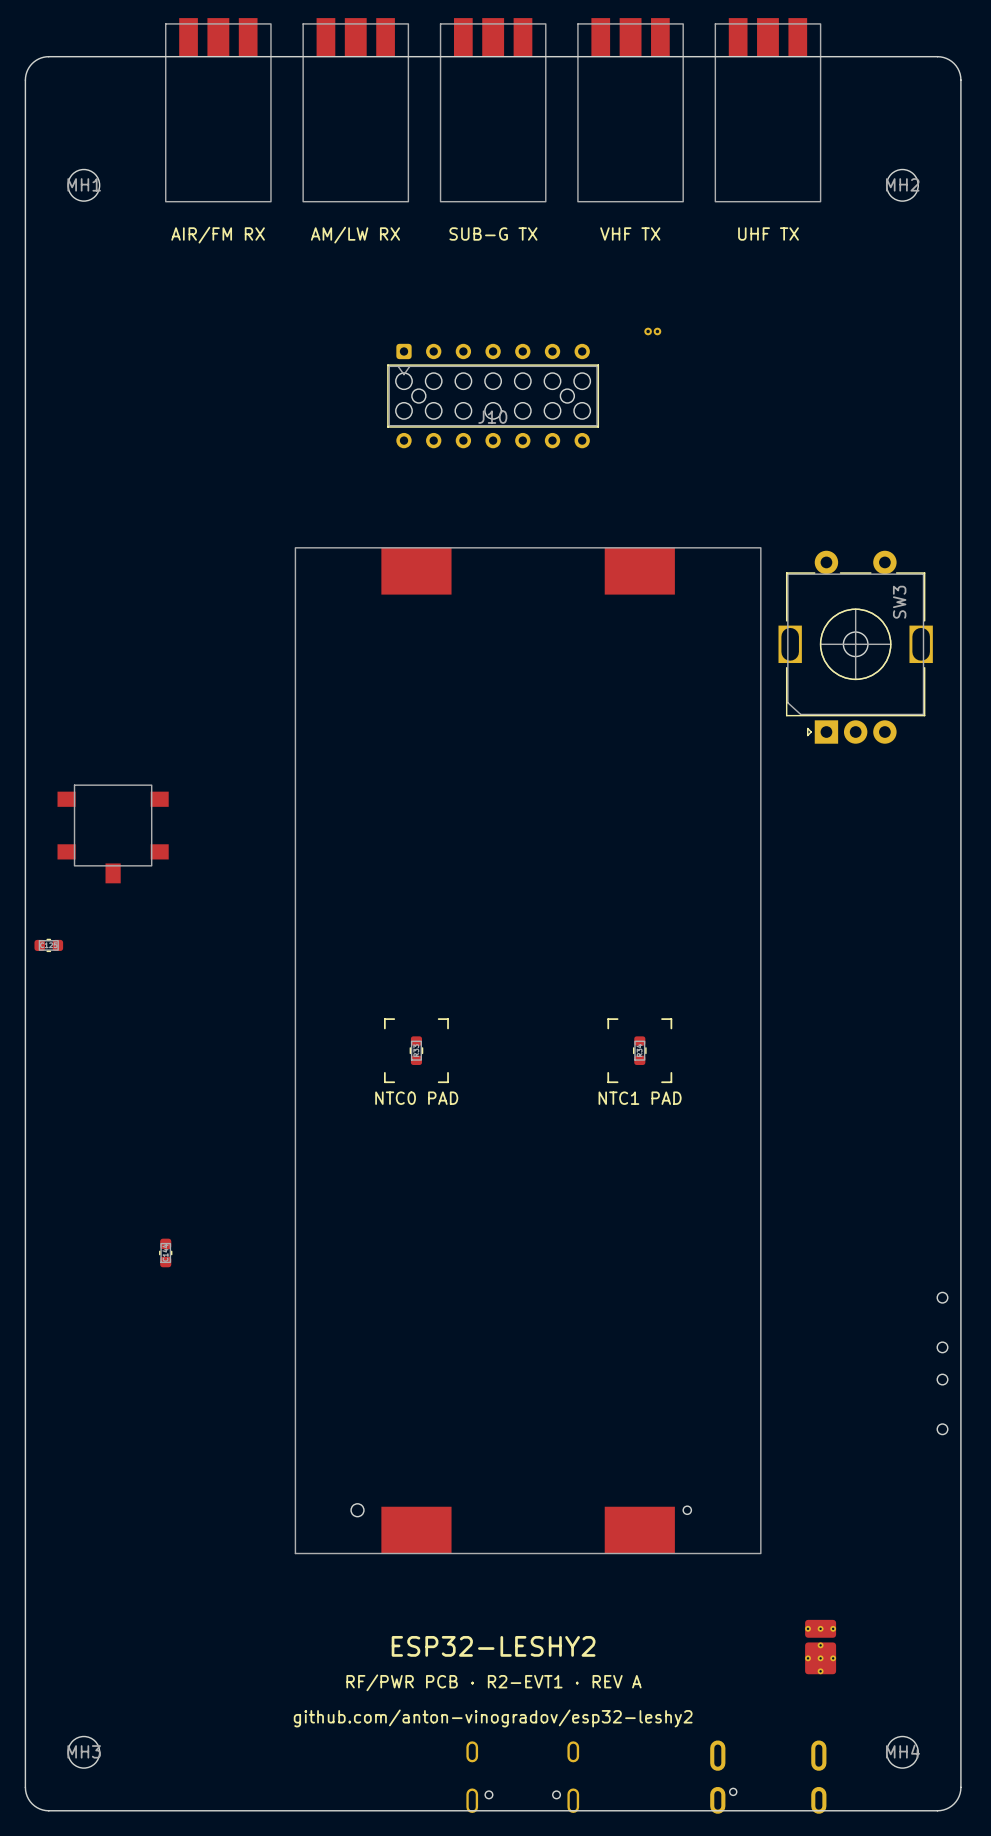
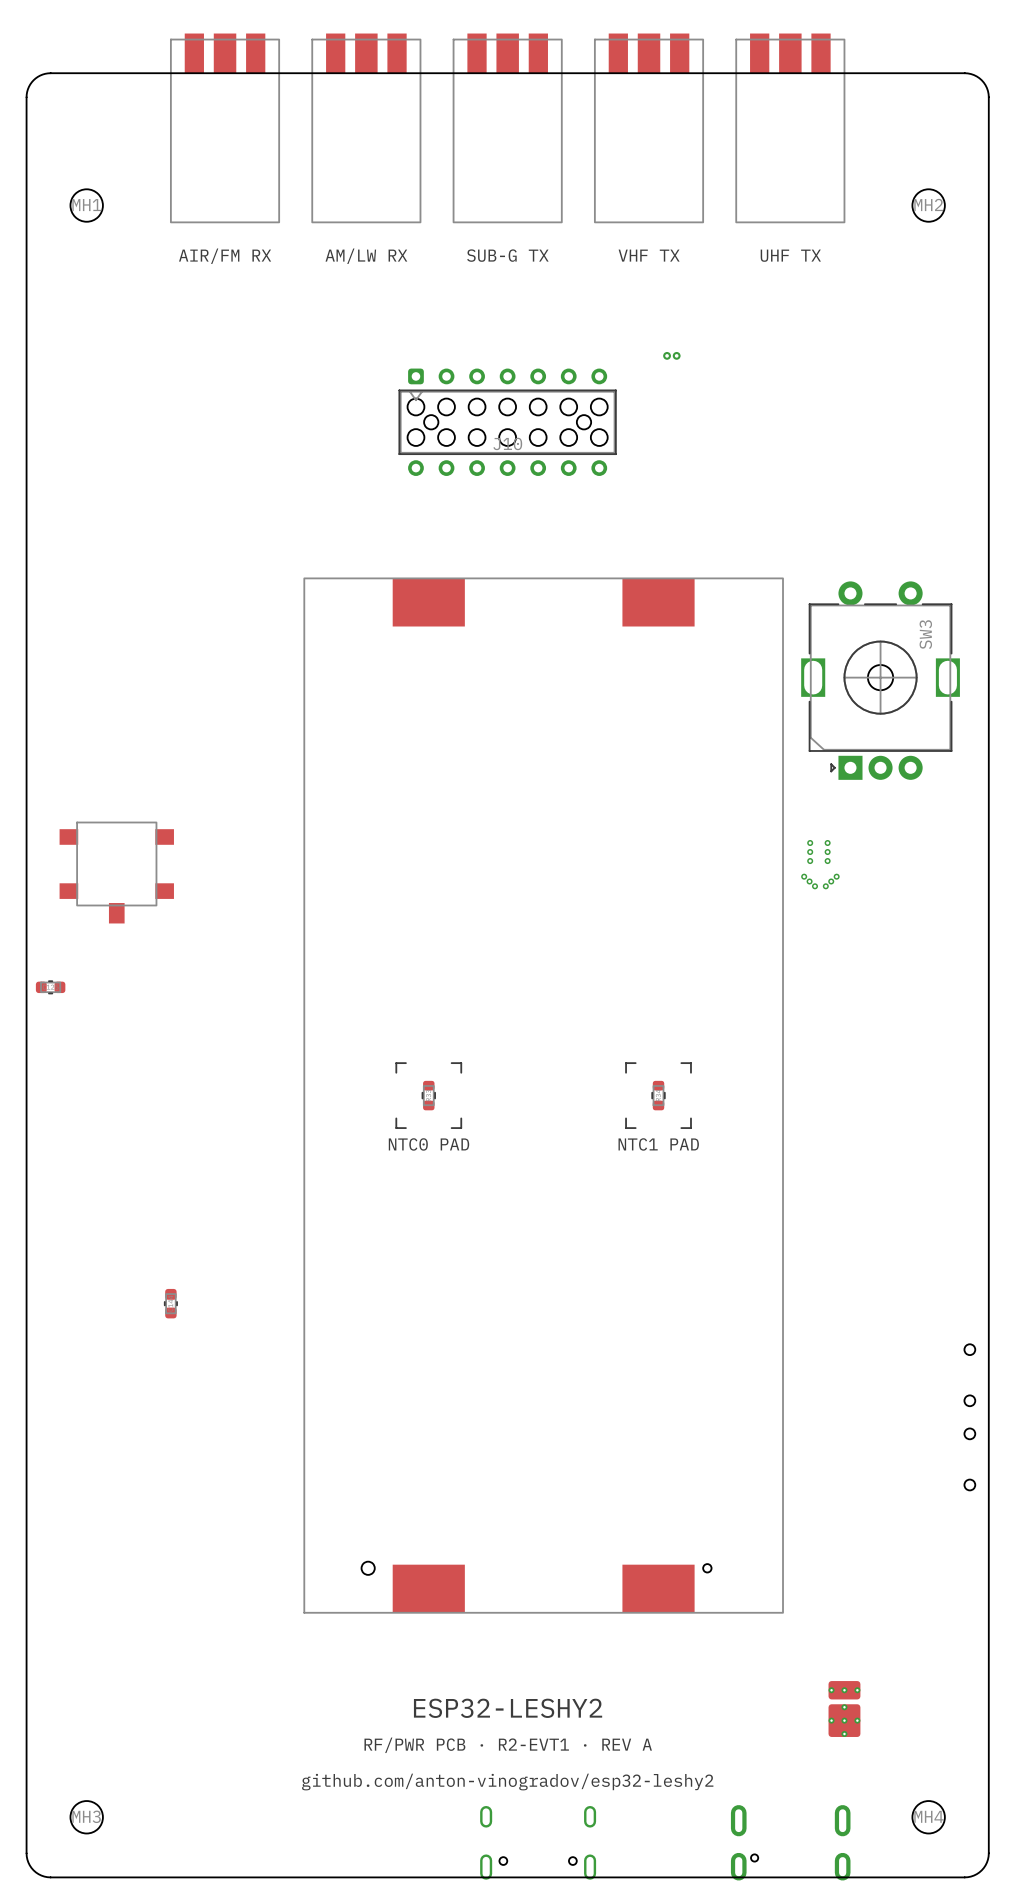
via: none -> (810, 843)
via: none -> (827, 843)
via: none -> (810, 852)
via: none -> (827, 852)
via: none -> (810, 861)
via: none -> (827, 861)
via: none -> (804, 876)
via: none -> (836, 876)
via: none -> (809, 881)
via: none -> (831, 881)
via: none -> (815, 886)
via: none -> (825, 886)

